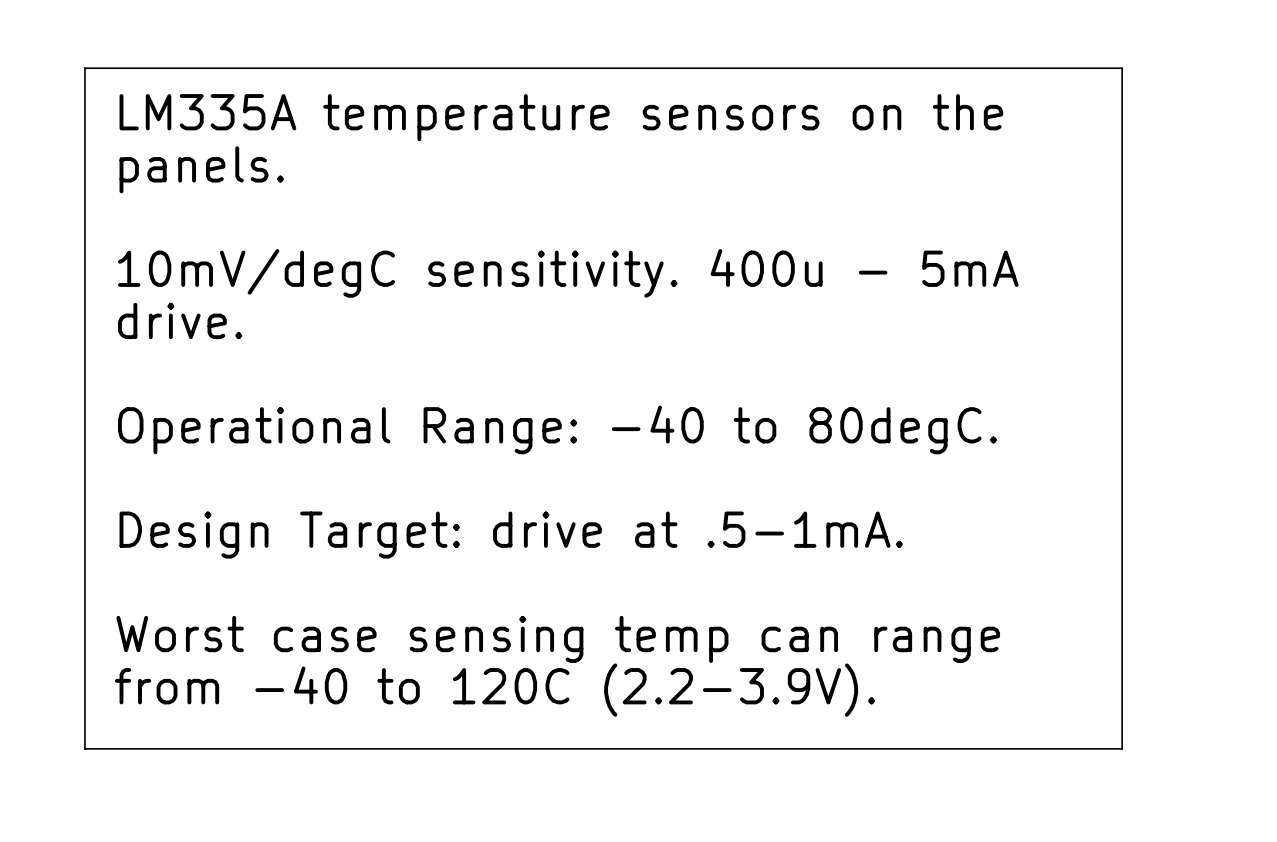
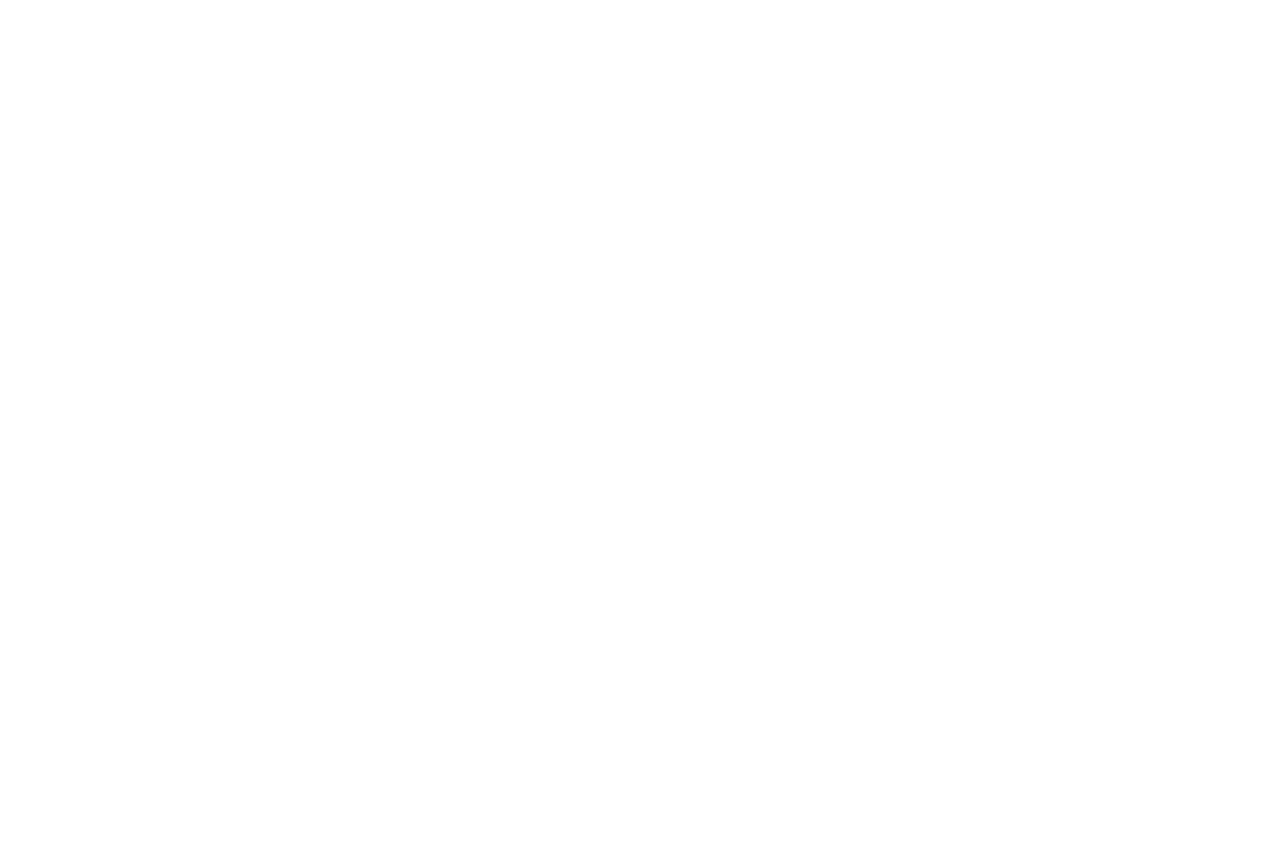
line: (84, 68) (1122, 68) (1122, 748) (84, 748) (84, 68) -> none
text: LM335A temperature sensors on the (561, 117) -> none
text: panels. (201, 169) -> none
text: 10mV/degC sensitivity. 400u - 5mA (568, 273) -> none
text: drive. (180, 320) -> none
text: Operational Range: -40 to 80degC. (557, 429) -> none
text: Design Target: drive at .5-1mA. (511, 535) -> none
text: Worst case sensing temp can range (558, 639) -> none
text: from -40 to 120C (2.2-3.9V). (494, 690) -> none

